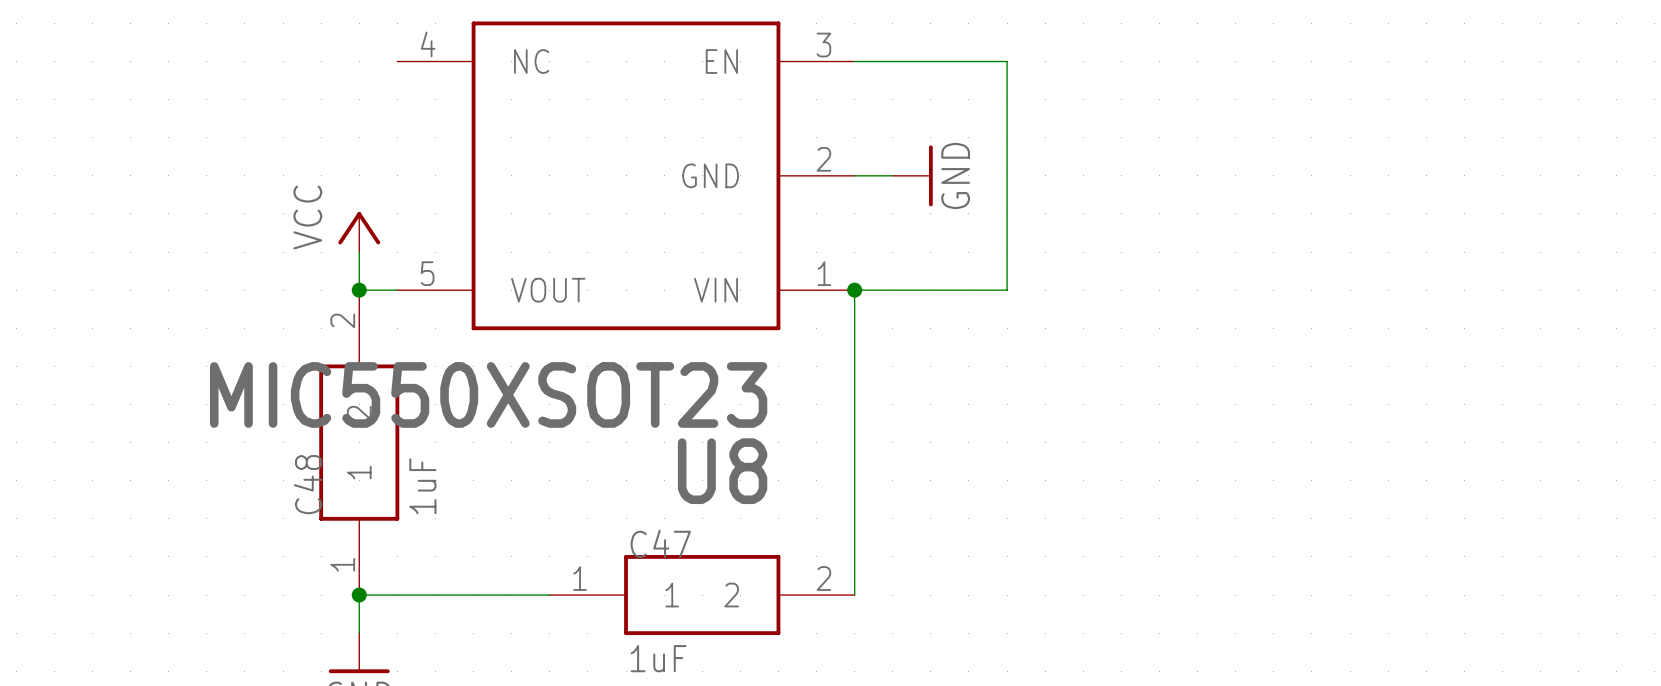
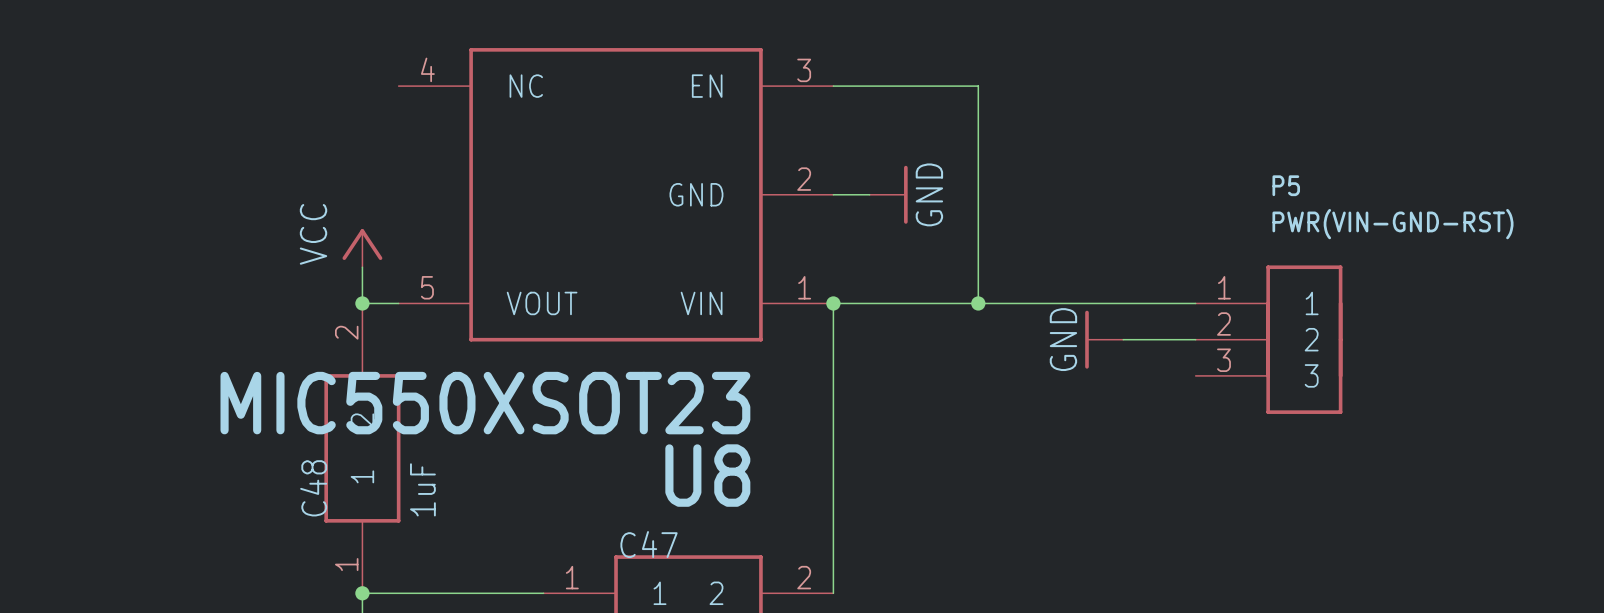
wire: none -> (978, 303) (1195, 303)
junction: none -> (978, 303)
power symbol: none -> GND (1104, 339)
wire: none -> (1123, 339) (1195, 339)
P5: none -> PWR(VIN-GND-RST) (1269, 339)

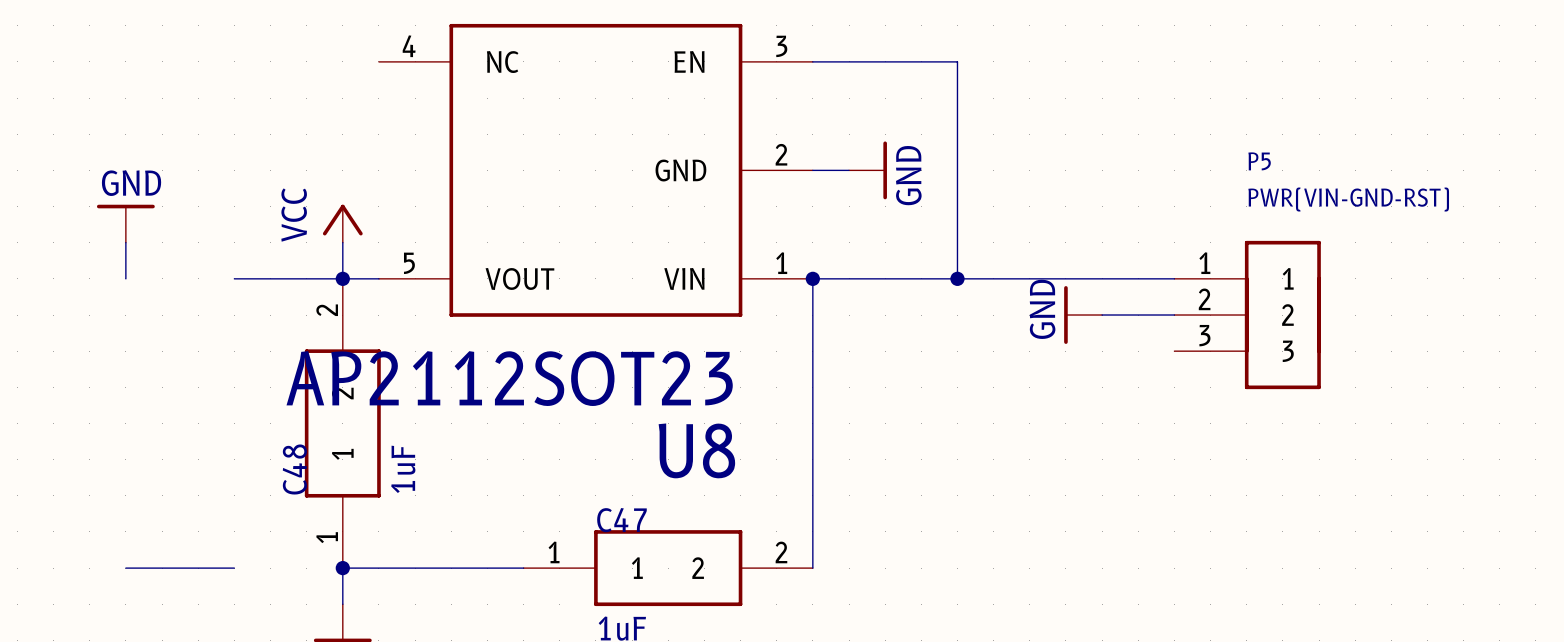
power symbol: none -> GND (125, 223)
wire: none -> (125, 242) (125, 278)
wire: none -> (234, 278) (342, 278)
U8 value: MIC550XSOT23 (485, 403) -> AP2112SOT23 (509, 378)
wire: none -> (125, 568) (234, 568)

